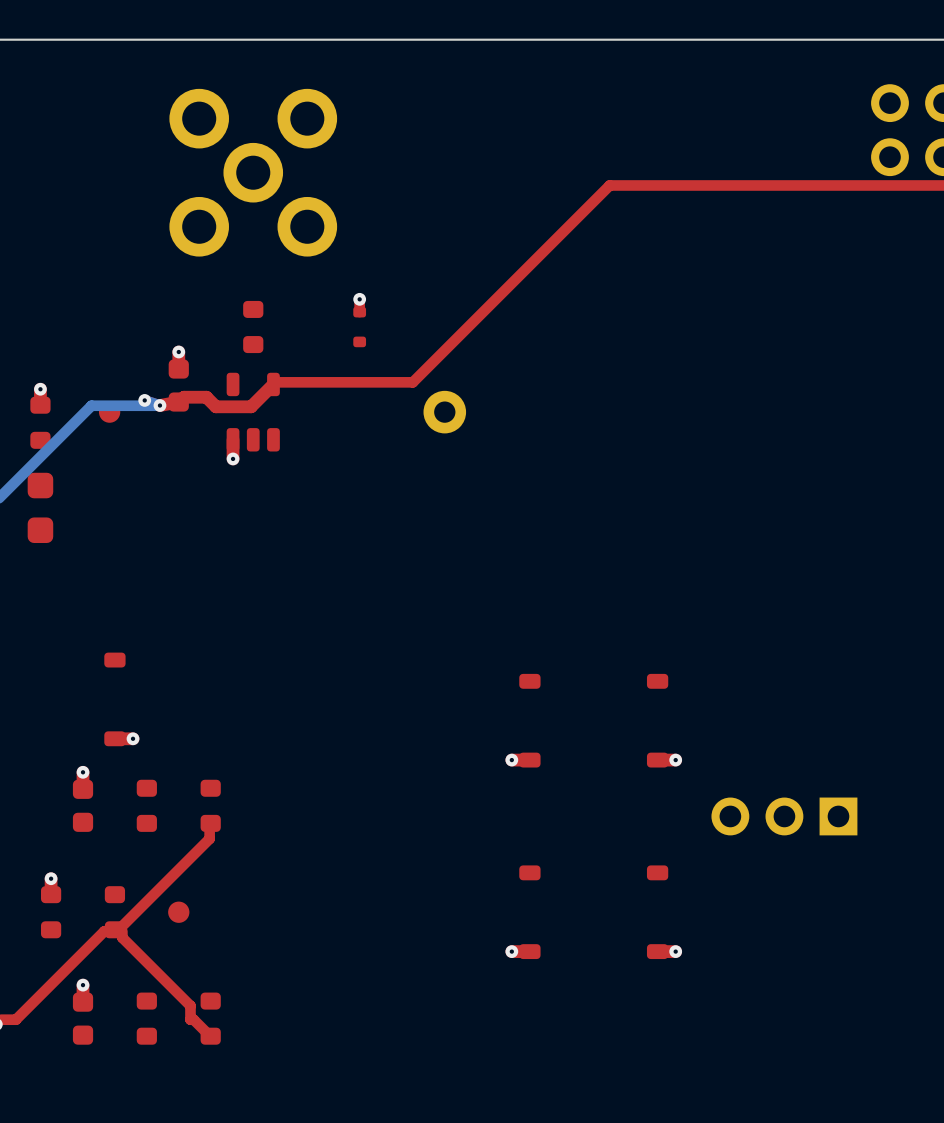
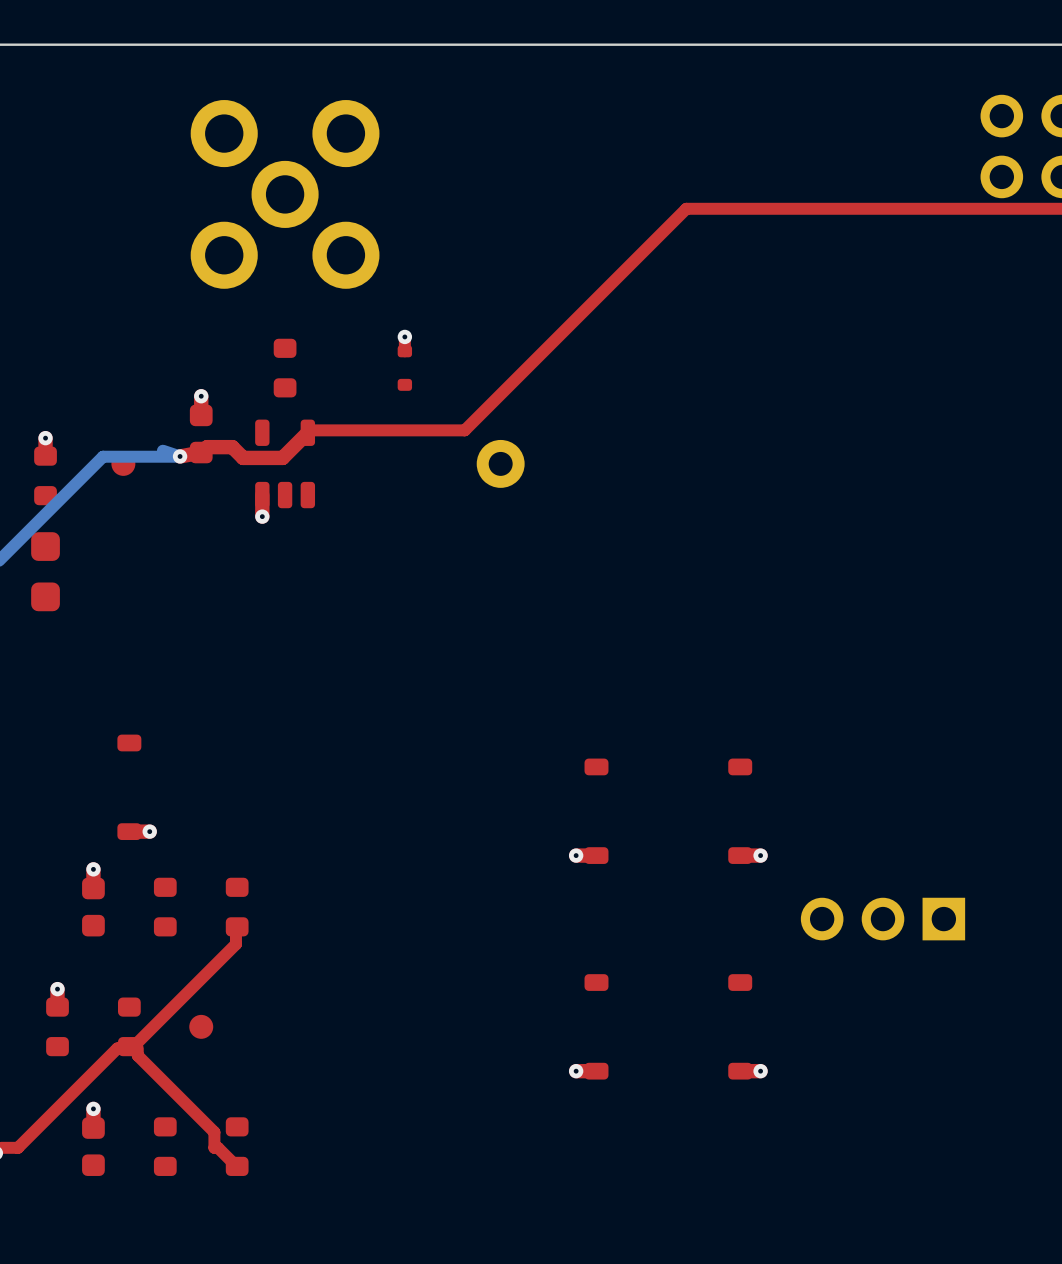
via: (144, 400) -> none

